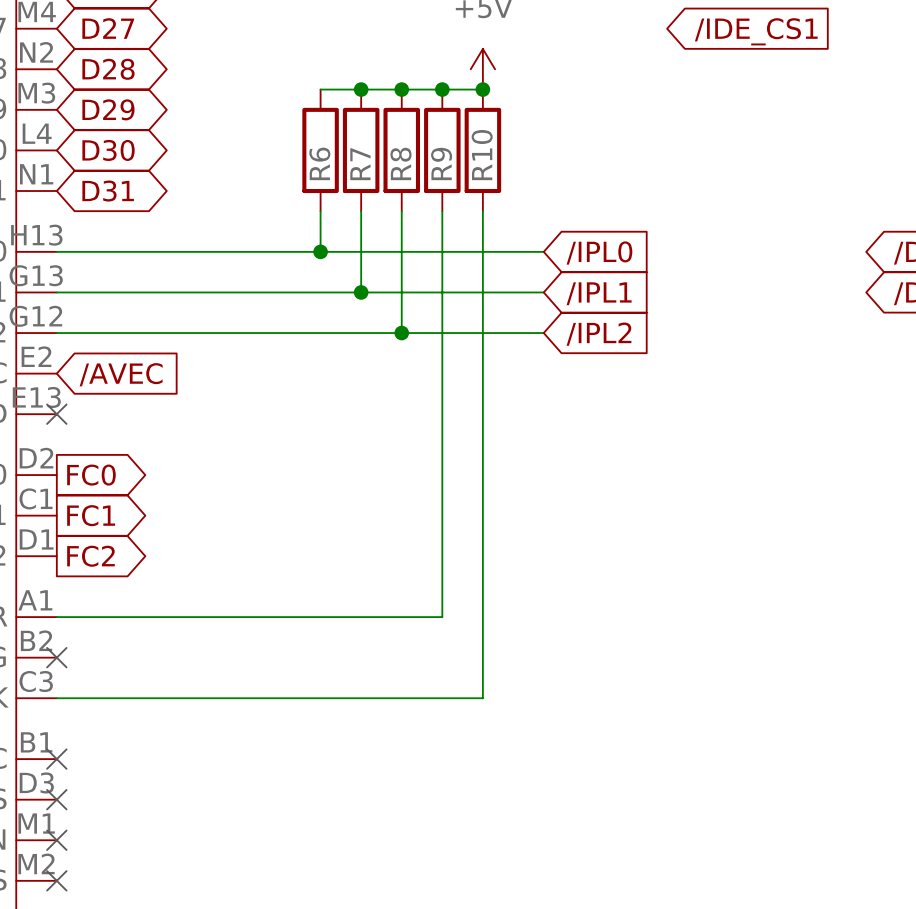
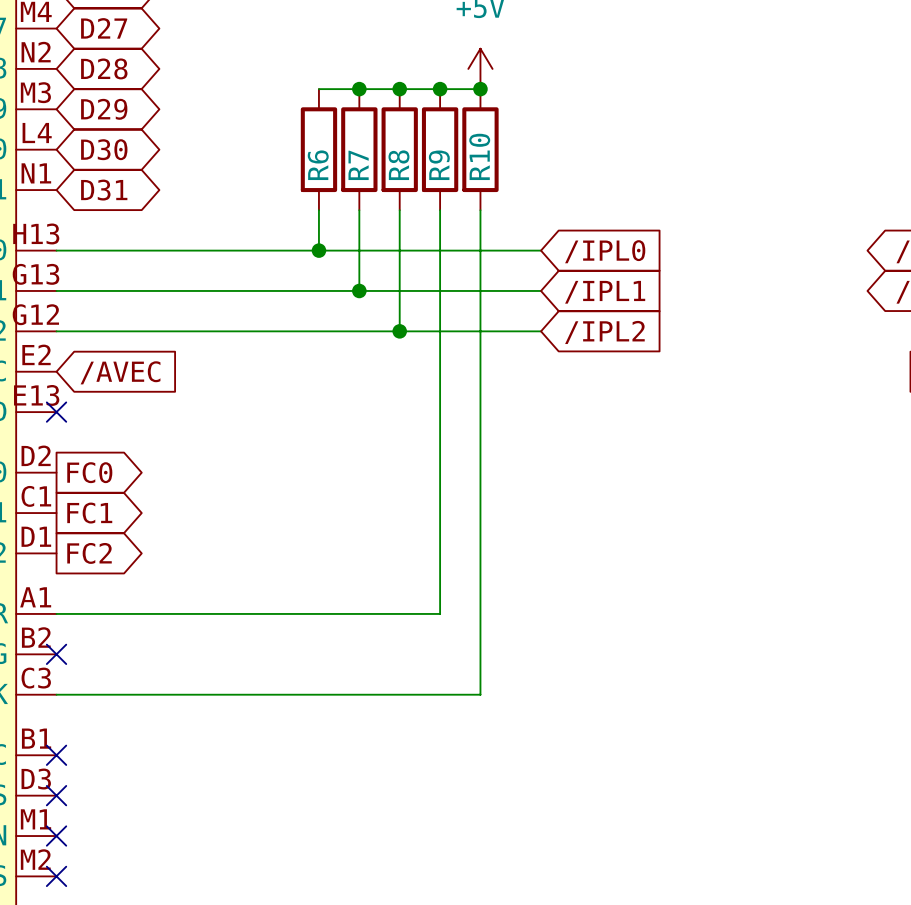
global label: /IDE_CS1 (756, 31) -> none

